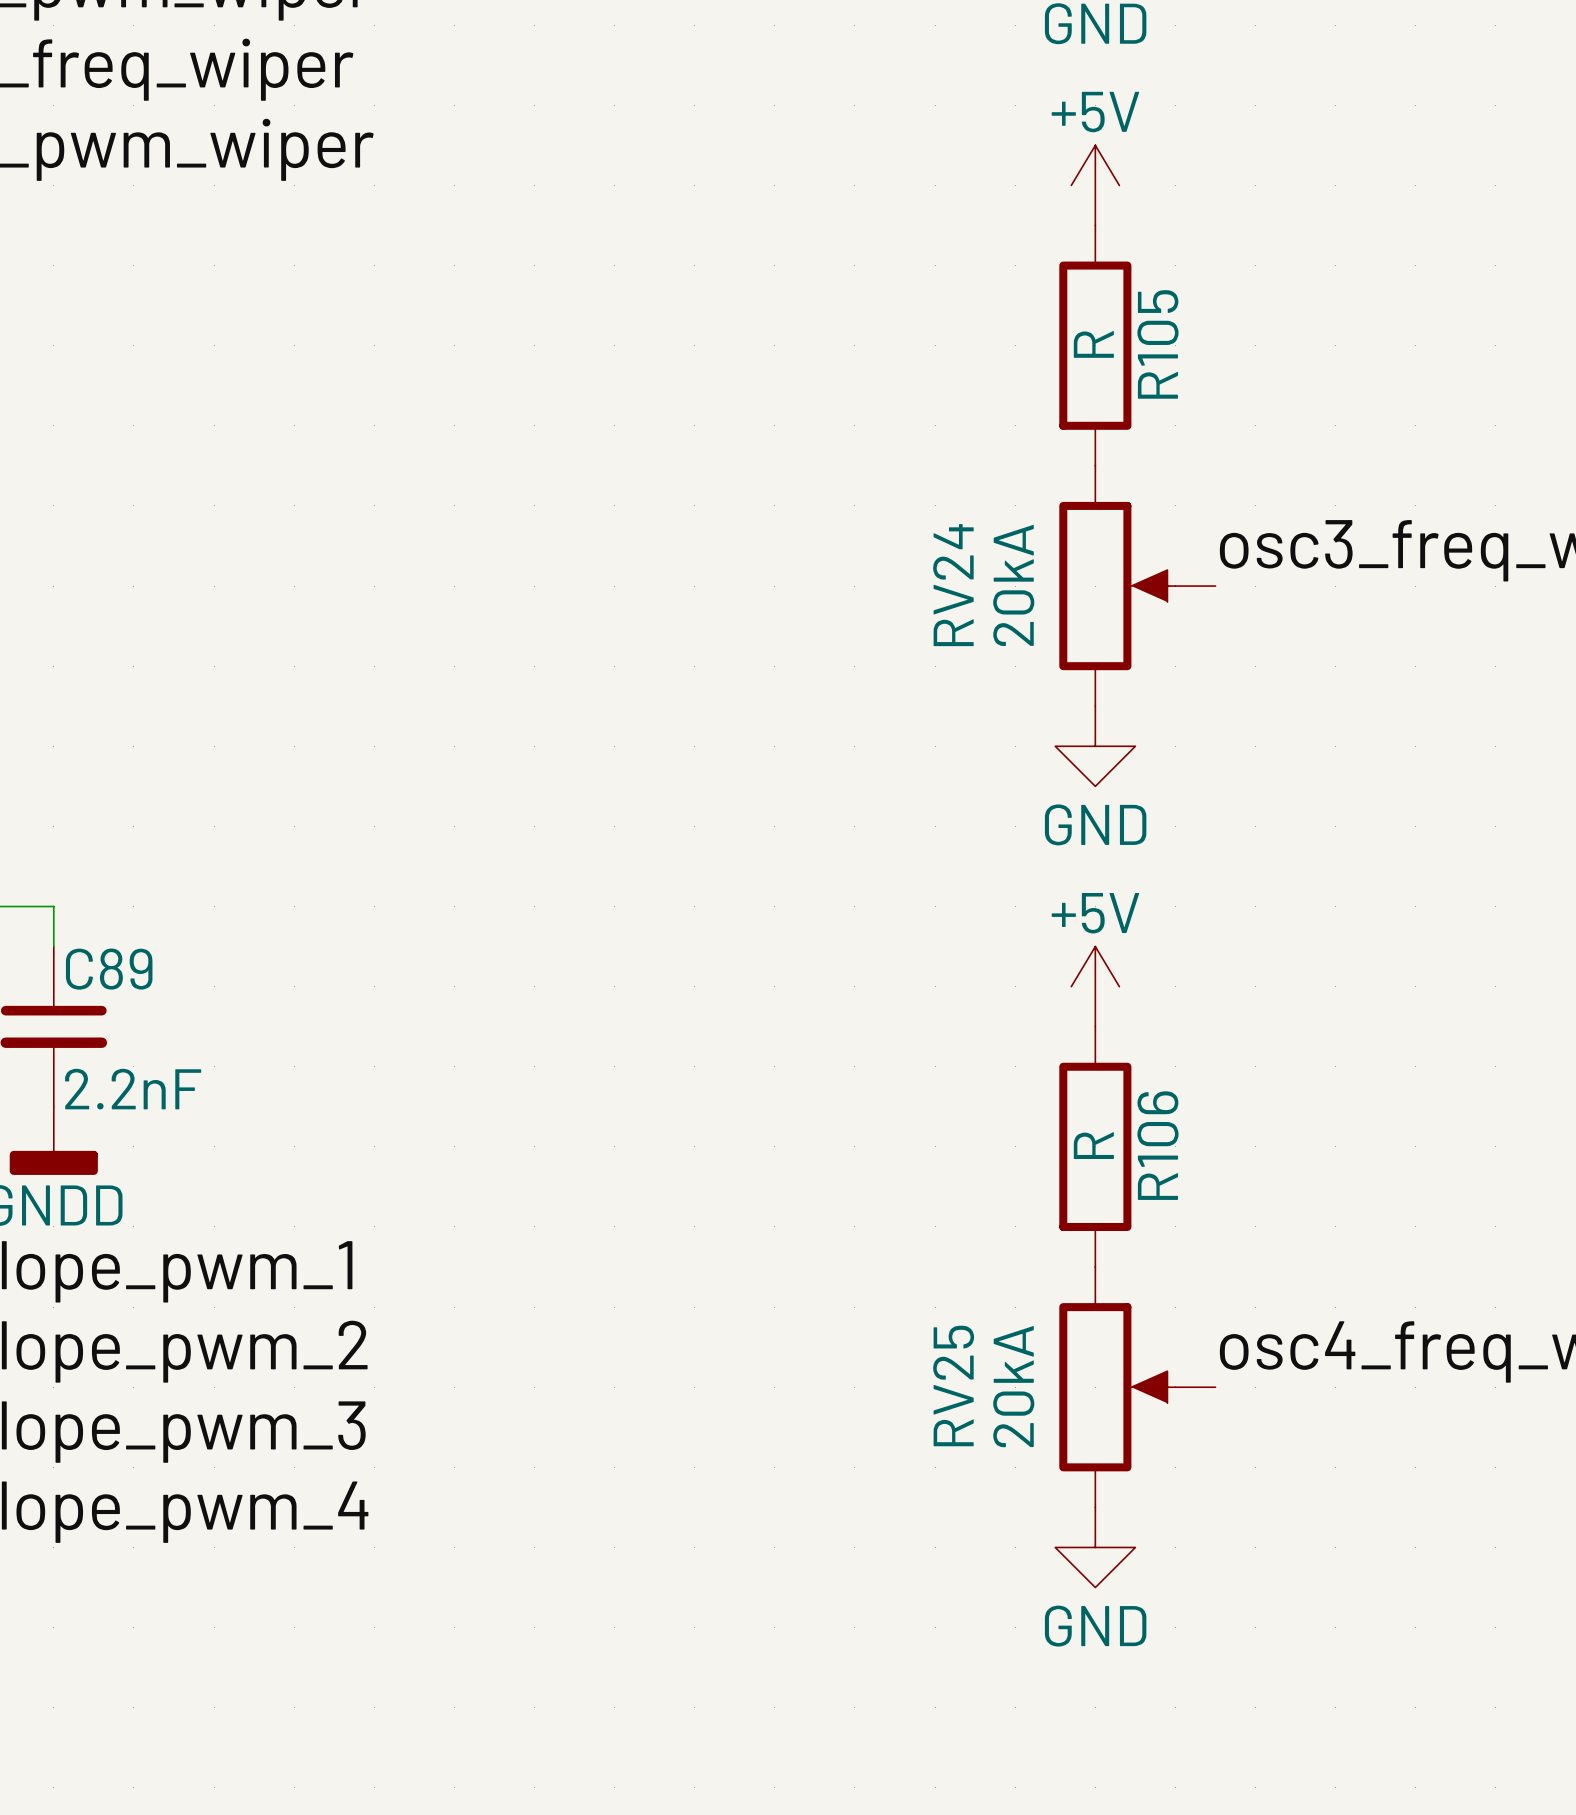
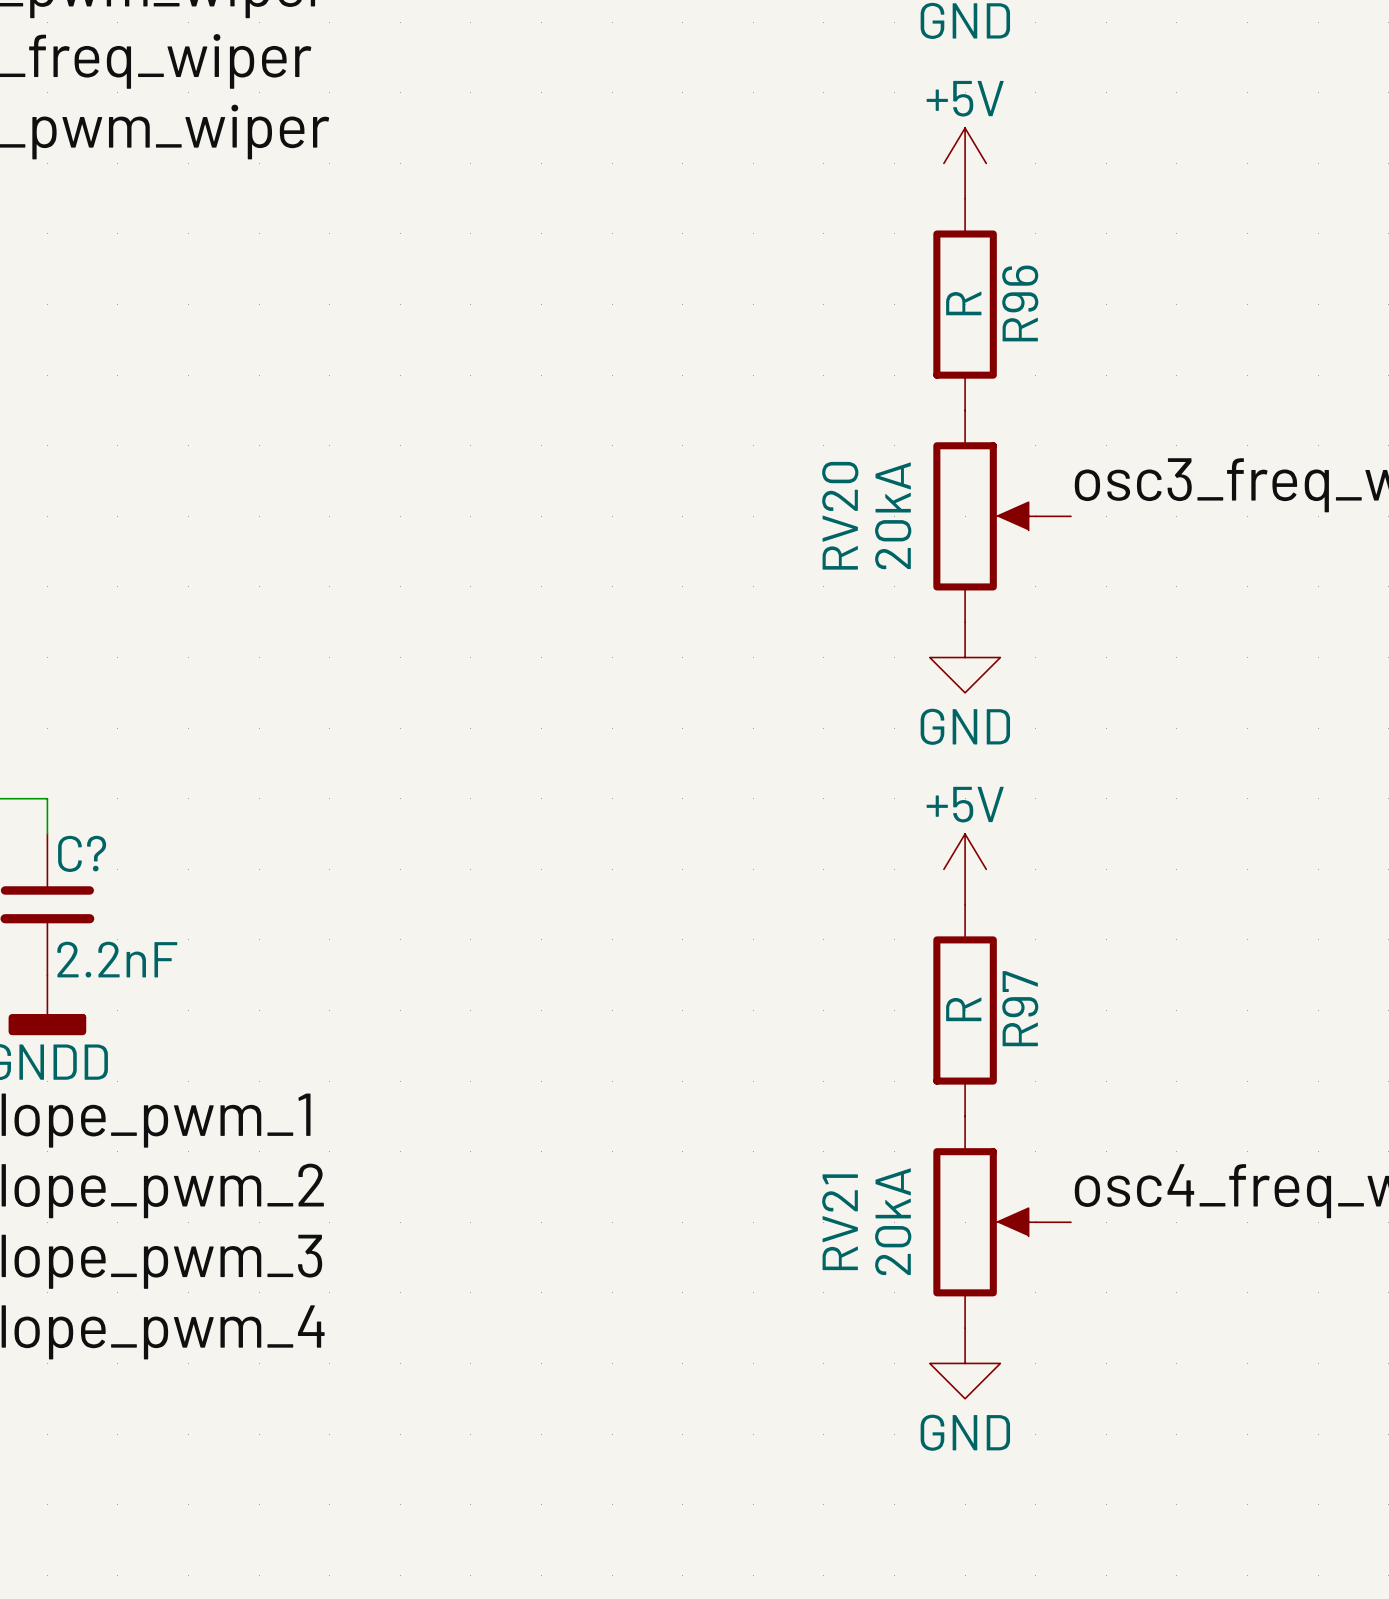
R105 name: R105 (1157, 344) -> R96 (1020, 303)
RV24 name: RV24 (953, 585) -> RV20 (840, 515)
C89 name: C89 (109, 969) -> C? (82, 853)
R106 name: R106 (1157, 1145) -> R97 (1020, 1008)
RV25 name: RV25 (953, 1385) -> RV21 (840, 1222)

